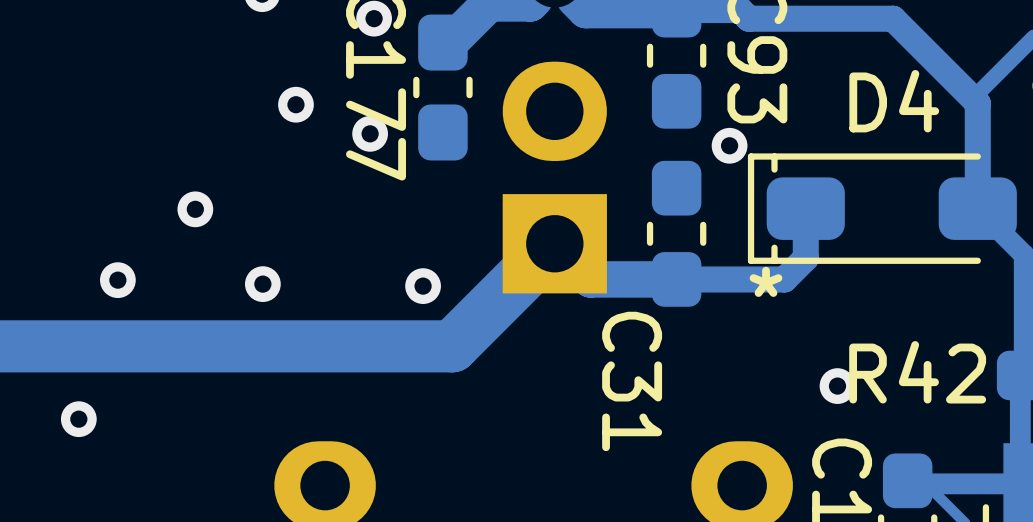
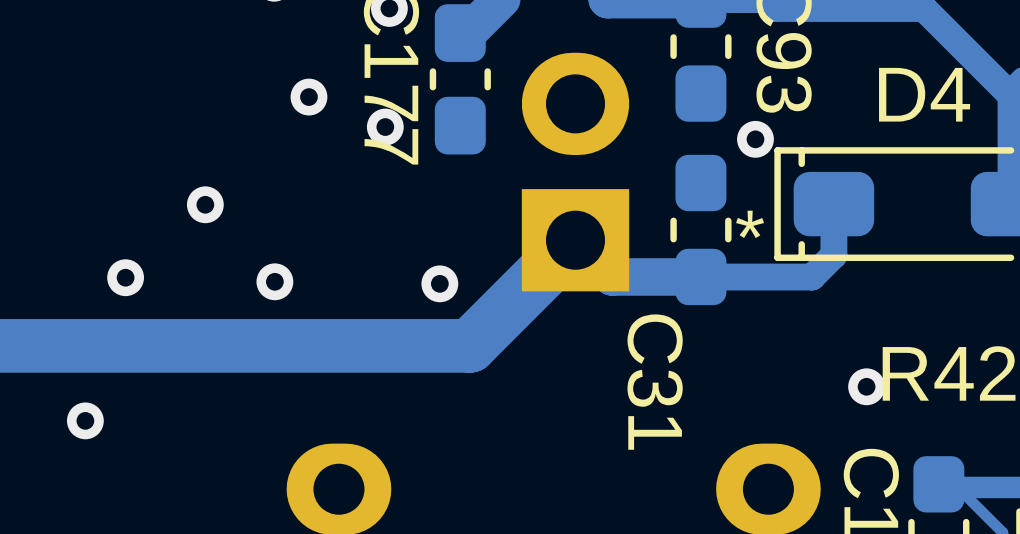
text position: * (766, 281) -> * (750, 224)

